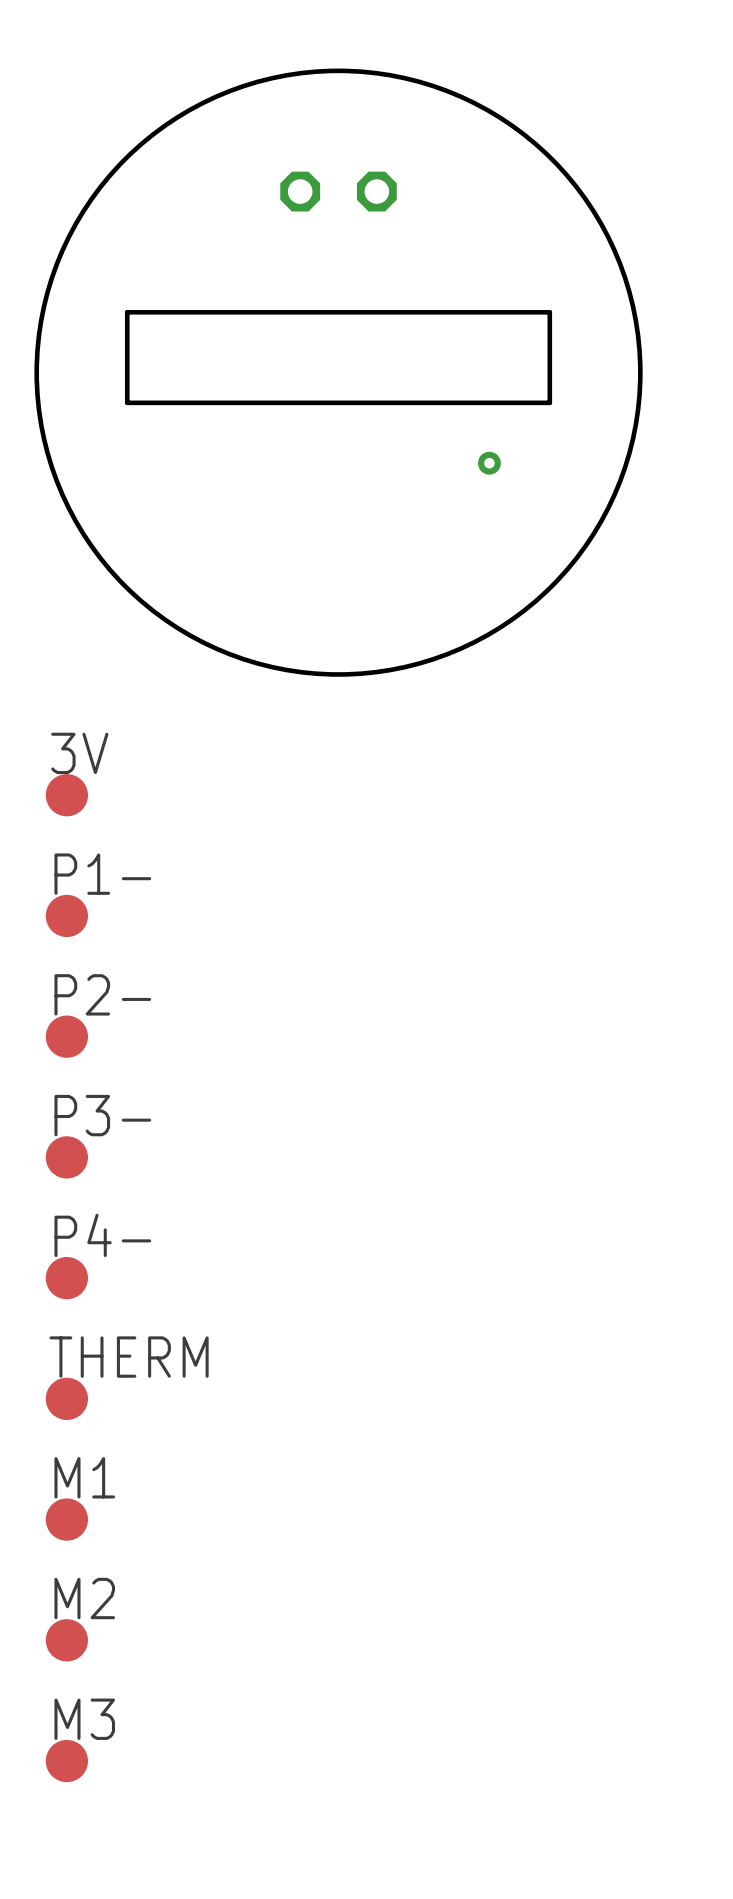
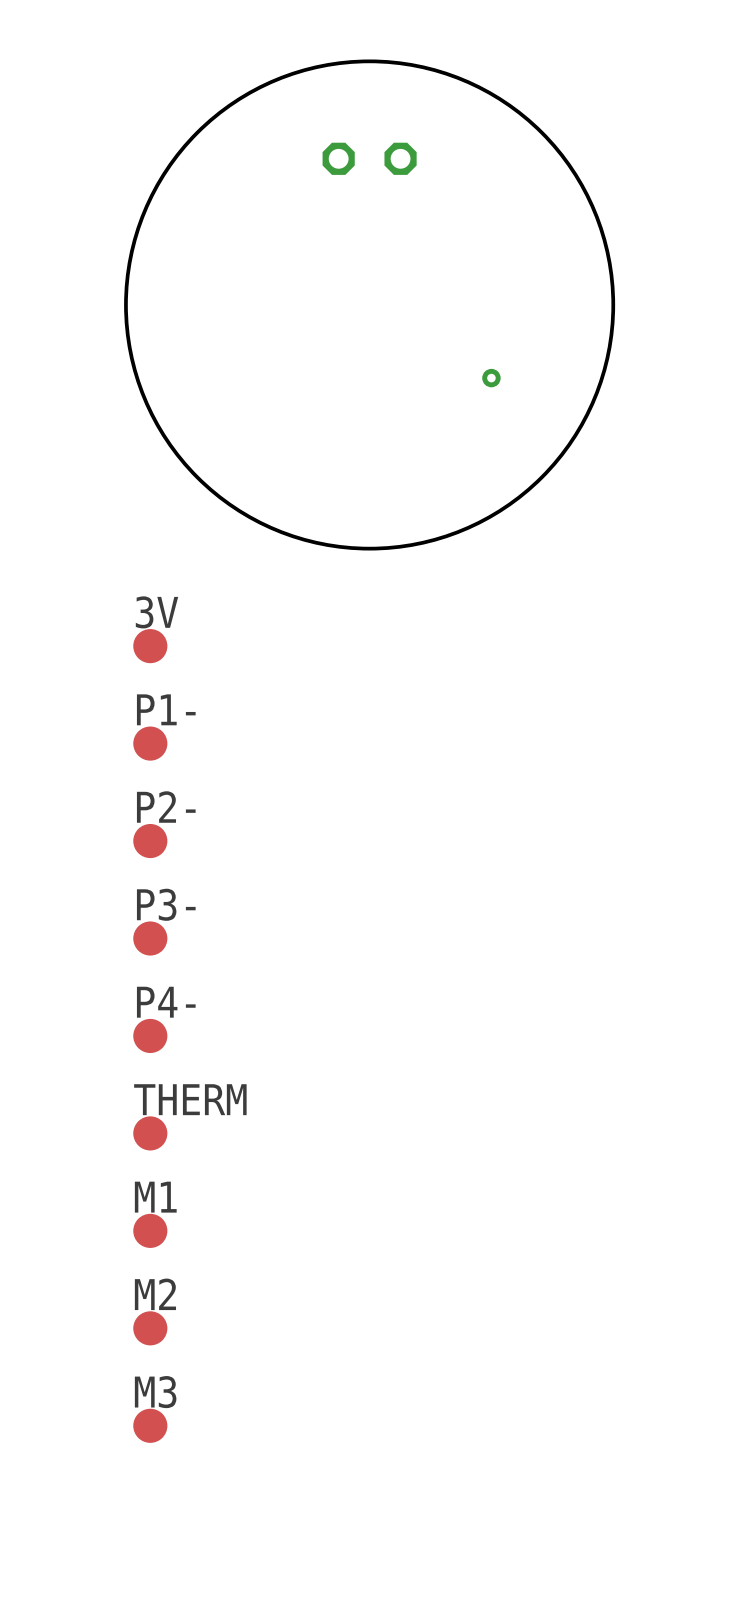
board edge: (127, 312) (127, 402) (549, 402) (549, 312) (127, 312) -> none

